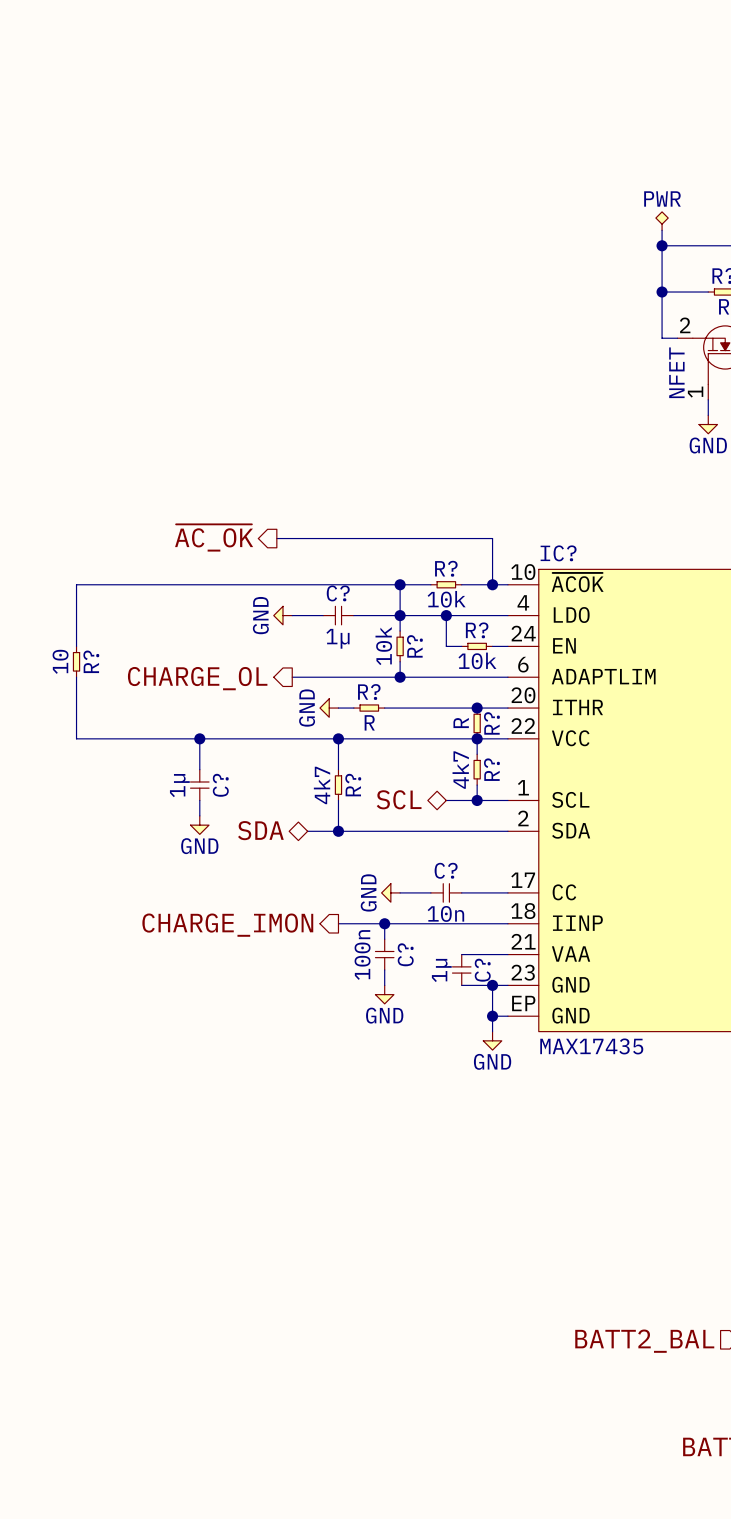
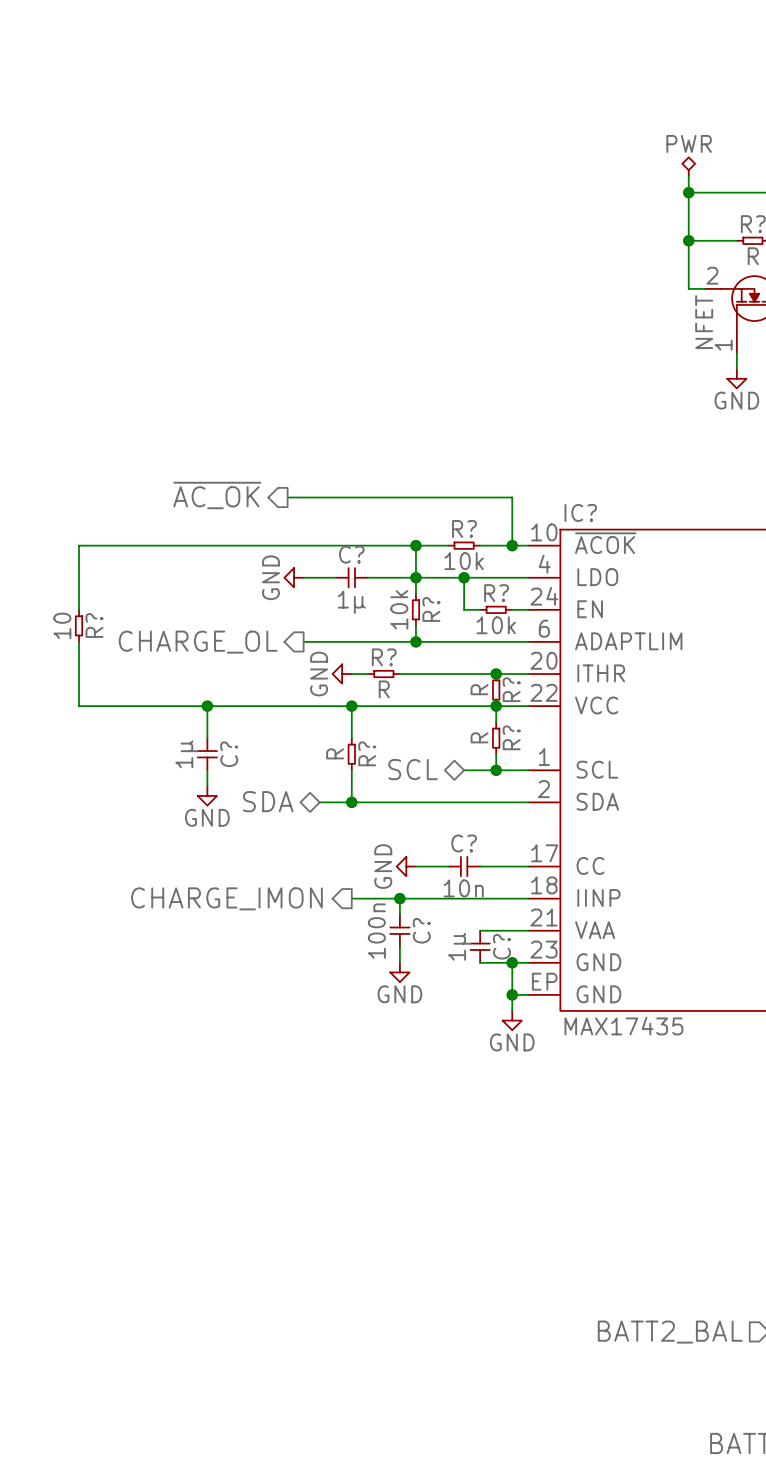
R? value: 4k7 (460, 770) -> R (479, 737)
R? value: 4k7 (322, 785) -> R (335, 753)

